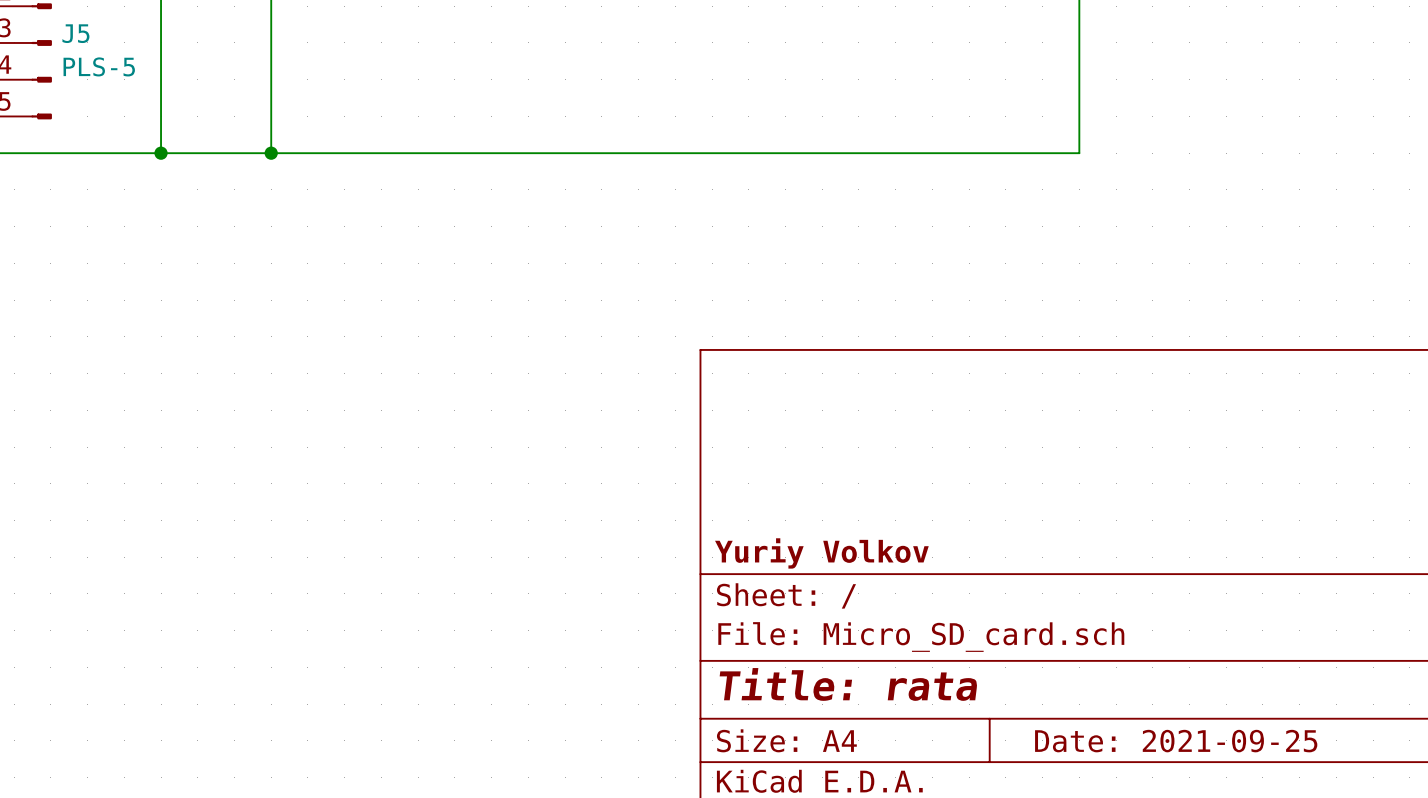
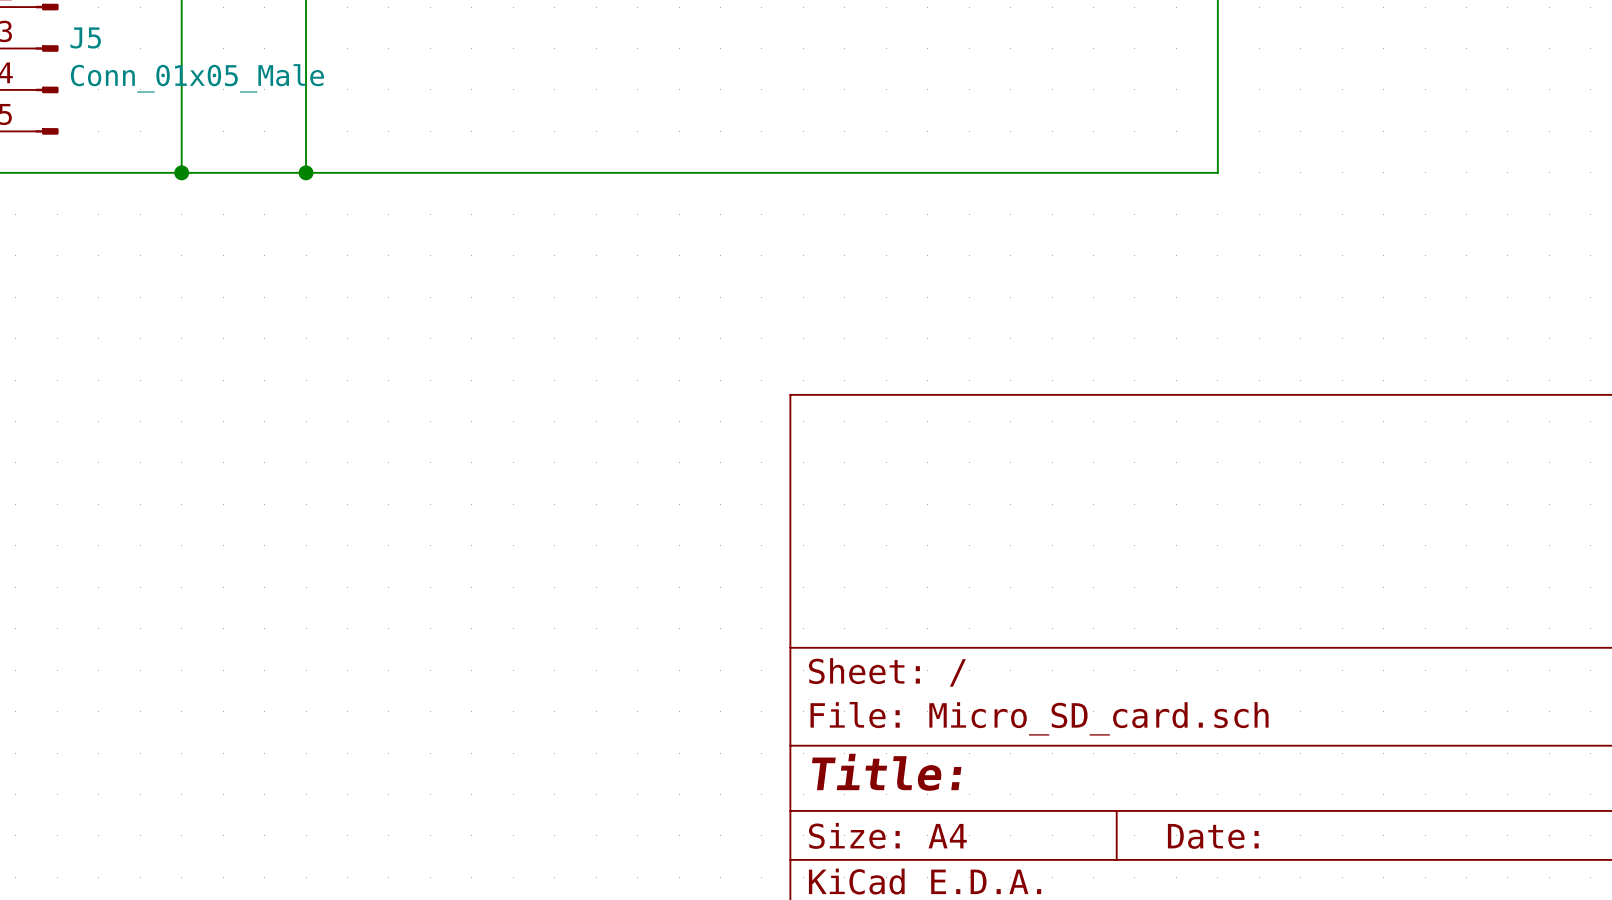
J5 value: PLS-5 (99, 66) -> Conn_01x05_Male (197, 78)
title block: Yuriy Volkov (821, 553) -> none
title block: Title: rata (848, 684) -> Title: (886, 772)
title block: Date: 2021-09-25 (1176, 741) -> Date: (1213, 836)

